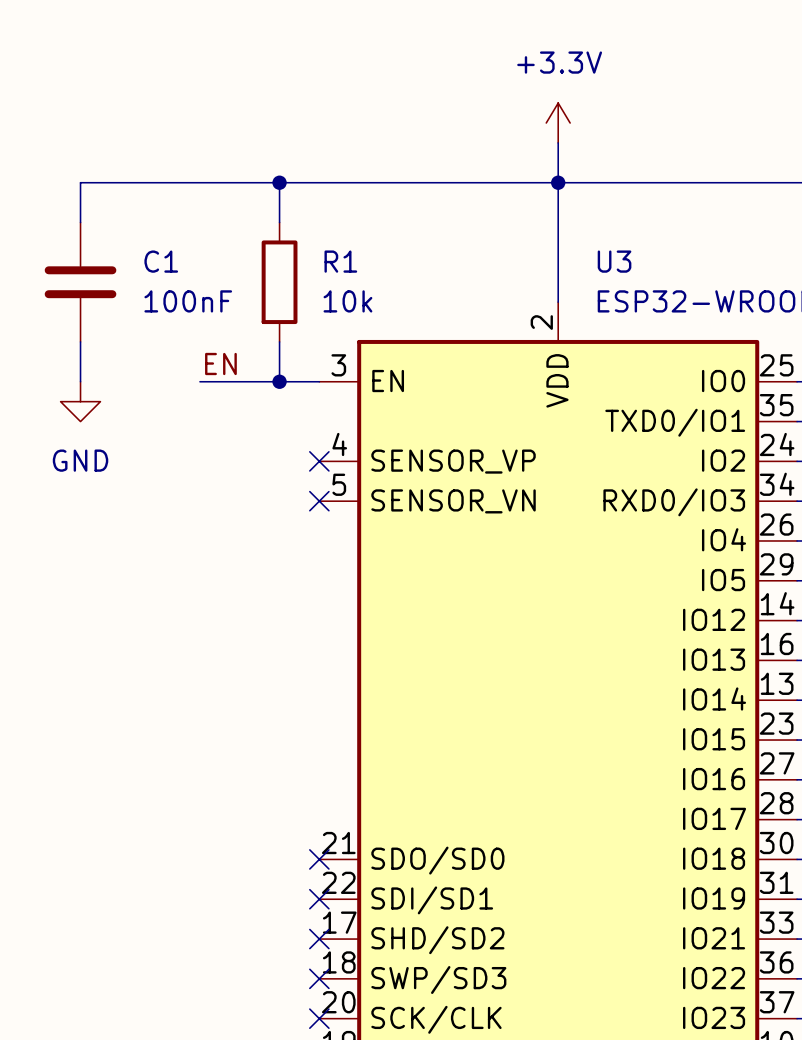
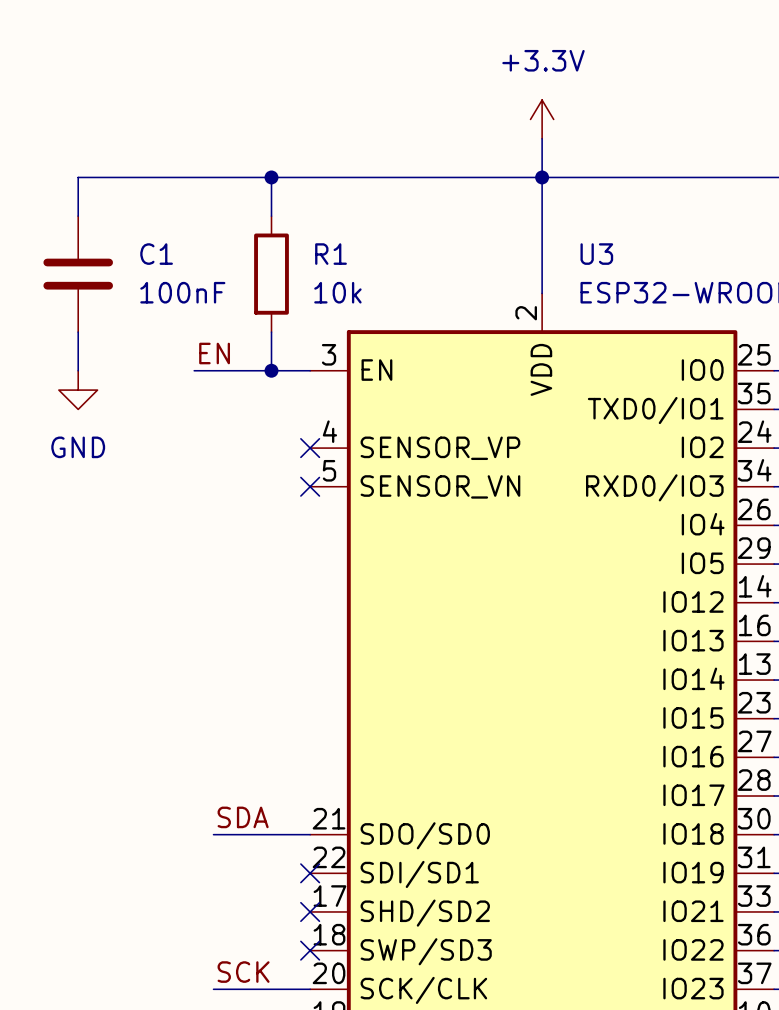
label: none -> SDA (243, 817)
wire: none -> (213, 834) (310, 834)
no-connect mark: (319, 859) -> none
label: none -> SCK (243, 972)
wire: none -> (213, 989) (310, 989)
no-connect mark: (319, 1018) -> none

